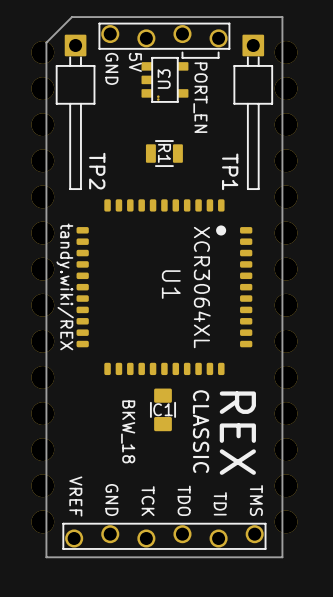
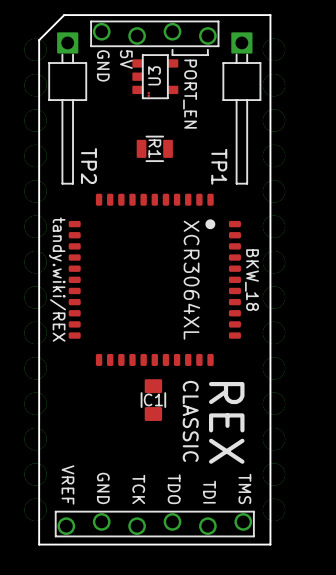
U1 name: U1 (171, 284) -> none
text position: BKW_18 (128, 431) -> BKW_18 (252, 280)

